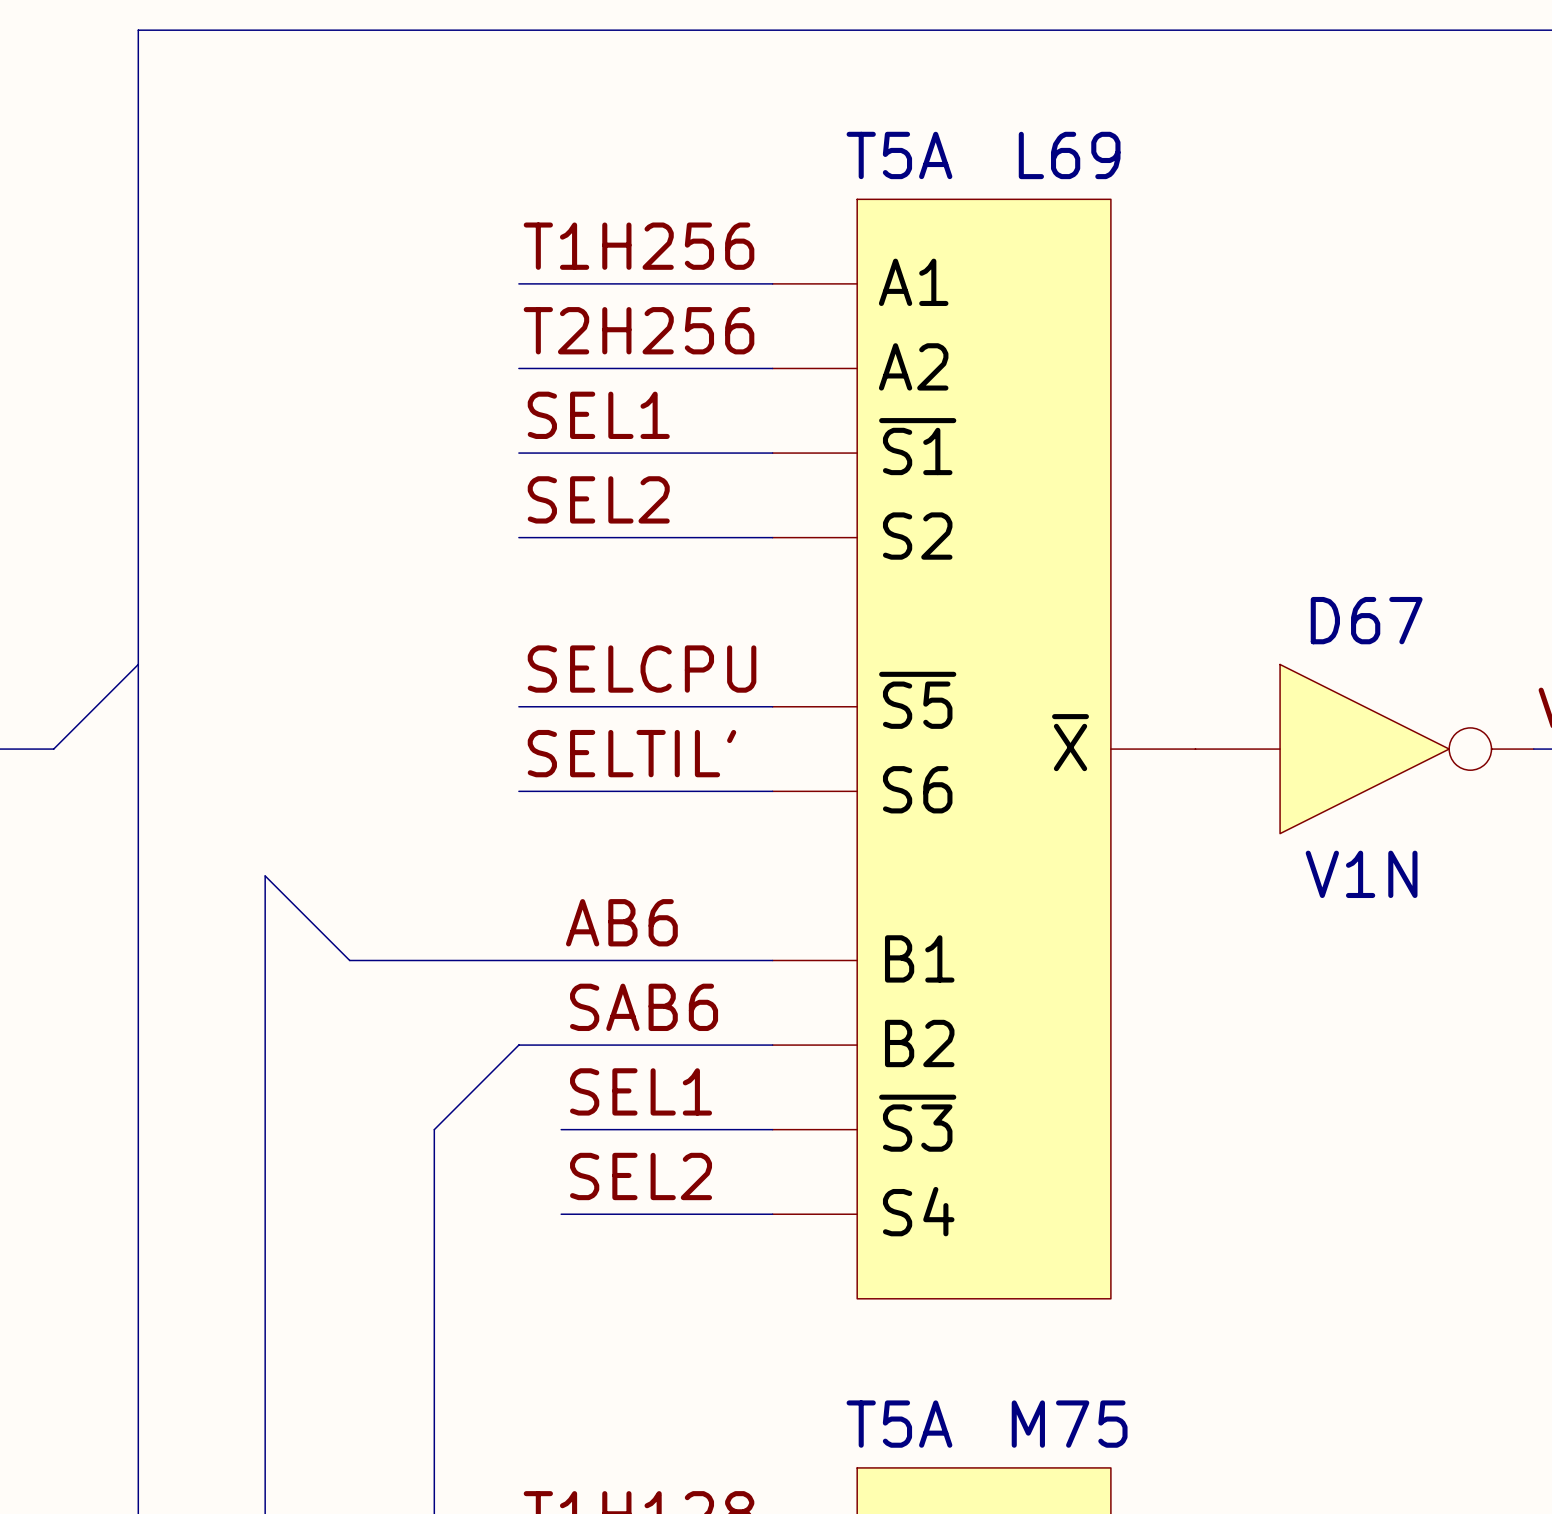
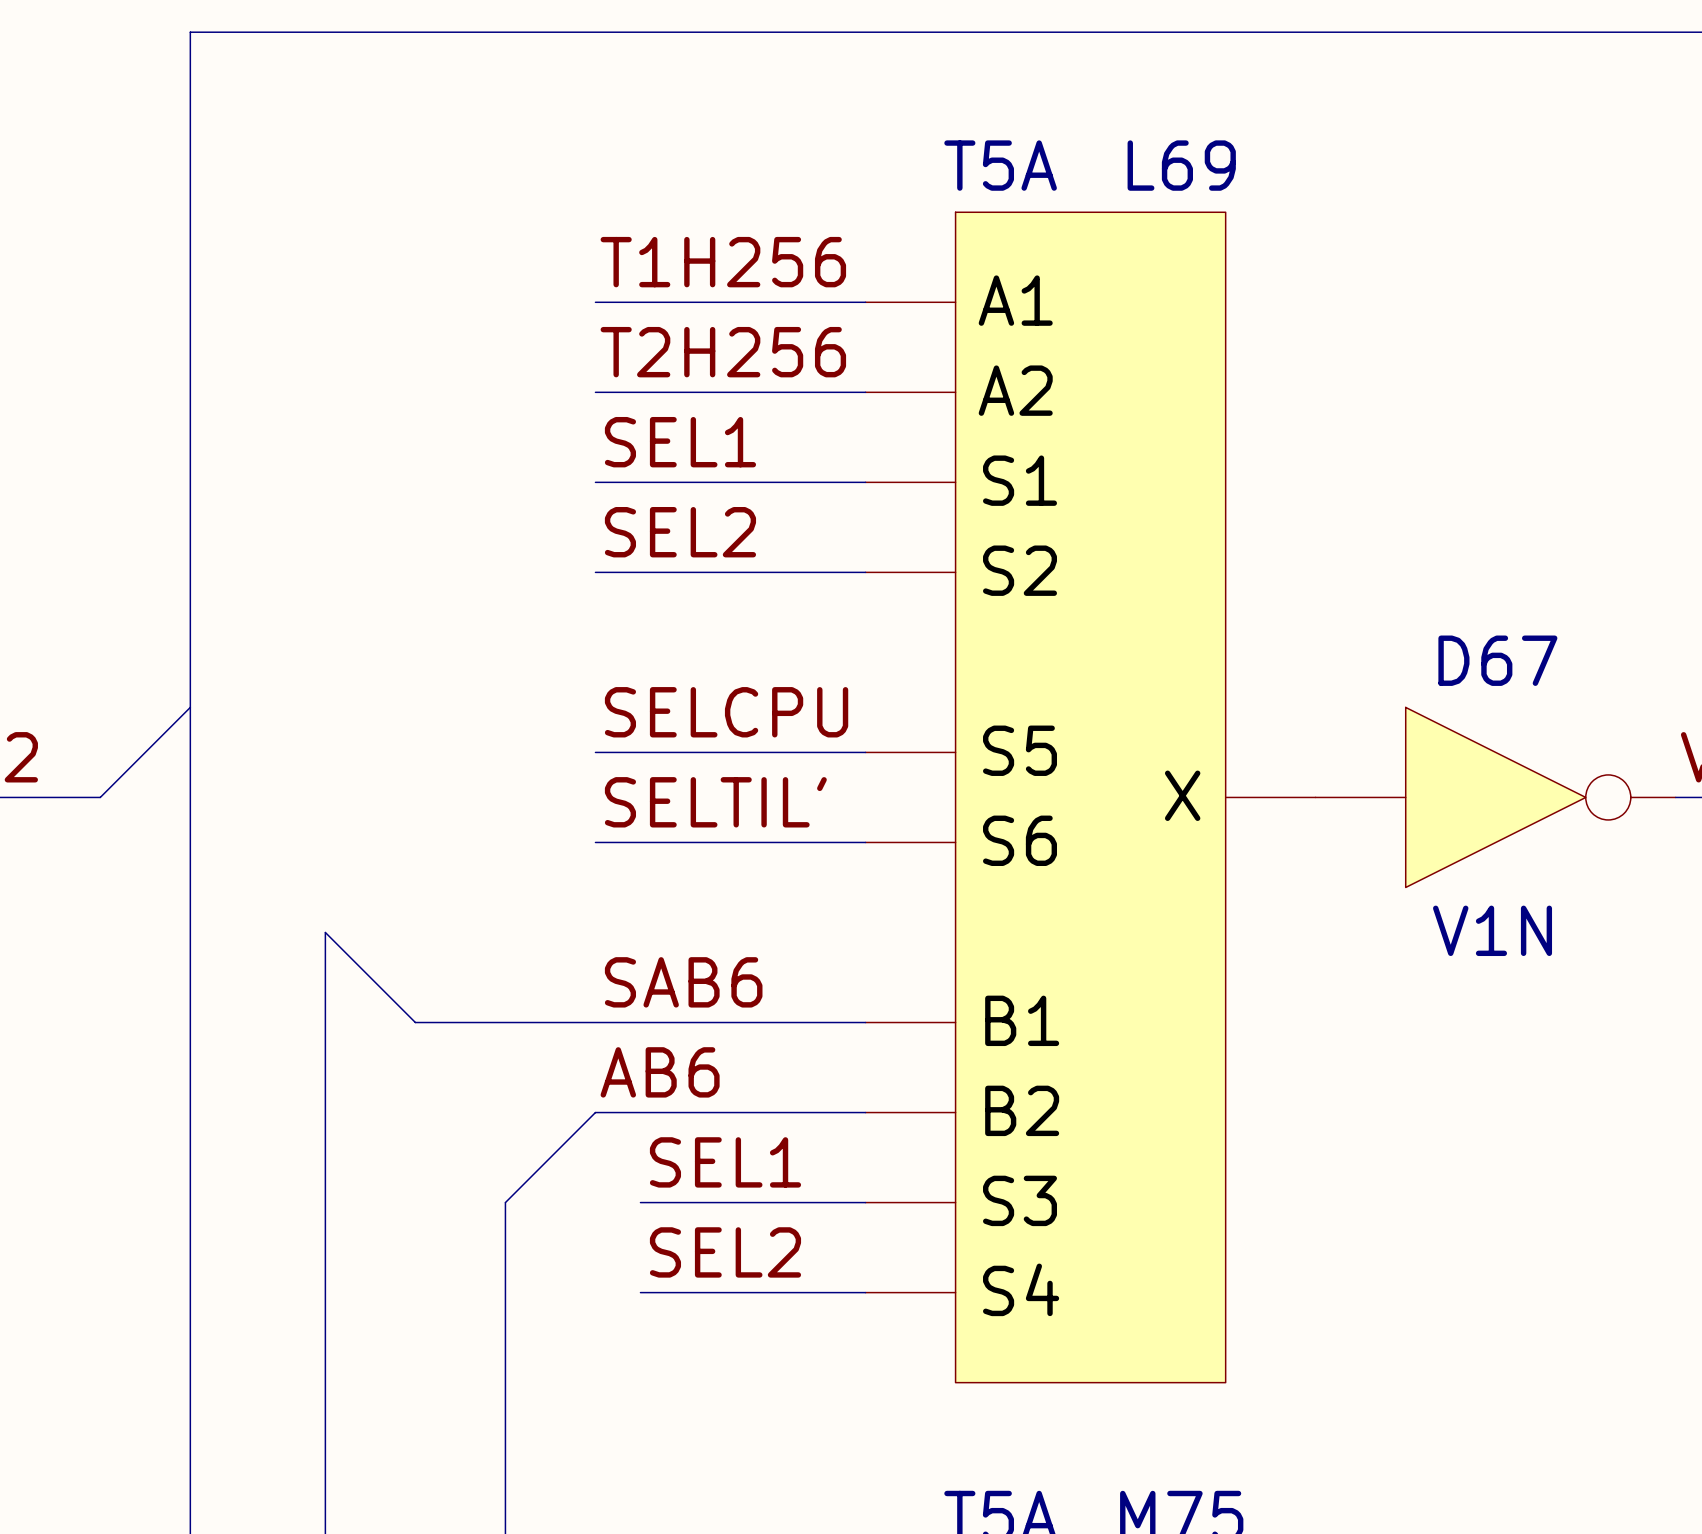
L69 pin name: ~{S1} (917, 446) -> S1 (1020, 480)
L69 pin name: ~{S5} (917, 700) -> S5 (1020, 750)
L69 pin name: ~{X} (1070, 742) -> X (1182, 795)
label position: AB6 (621, 922) -> AB6 (660, 1072)
label position: SAB6 (644, 1007) -> SAB6 (683, 982)
L69 pin name: ~{S3} (917, 1123) -> S3 (1020, 1200)

